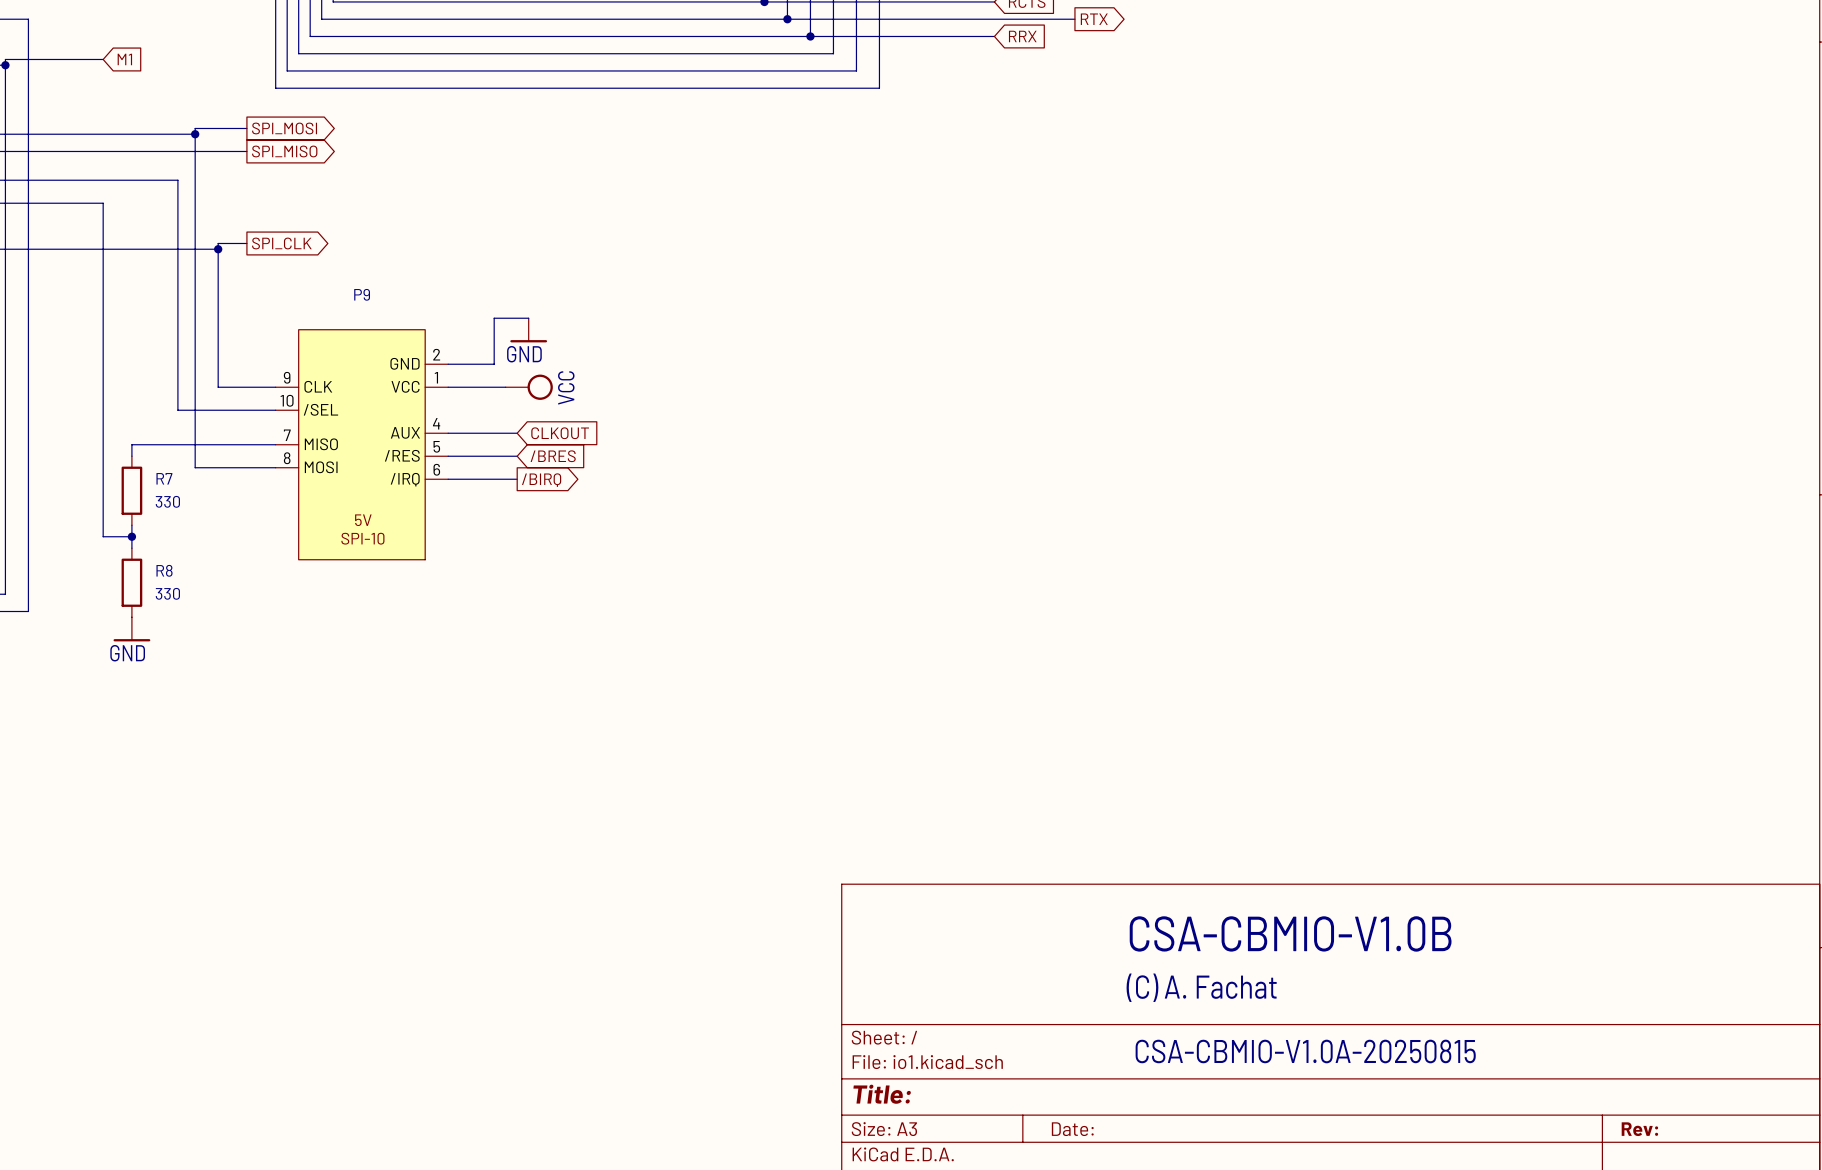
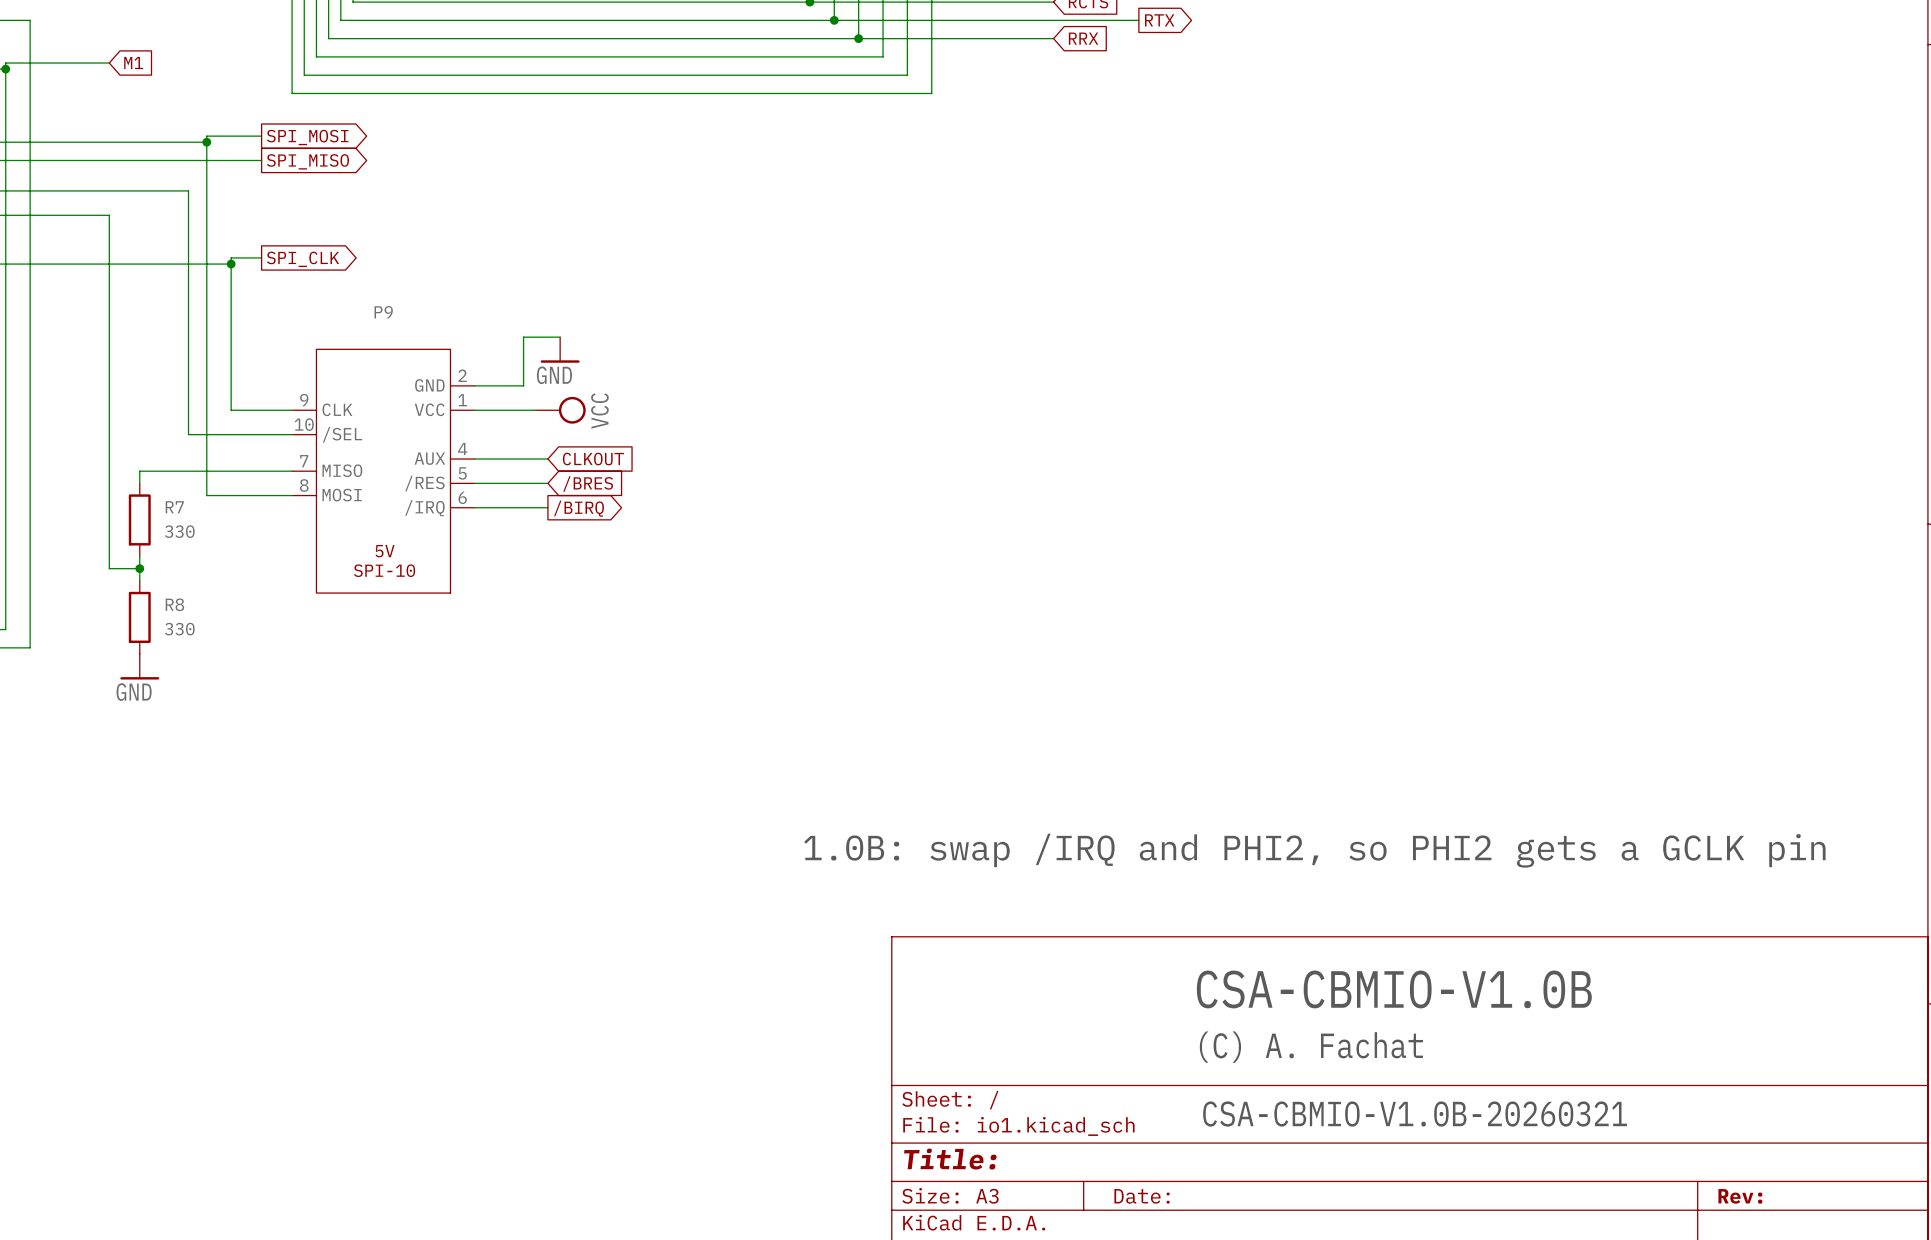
text: none -> 1.0B: swap /IRQ and PHI2, so PHI2 gets a GCLK pin (1314, 850)
text: CSA-CBMIO-V1.0A-20250815 (1305, 1051) -> CSA-CBMIO-V1.0B-20260321 (1415, 1114)

